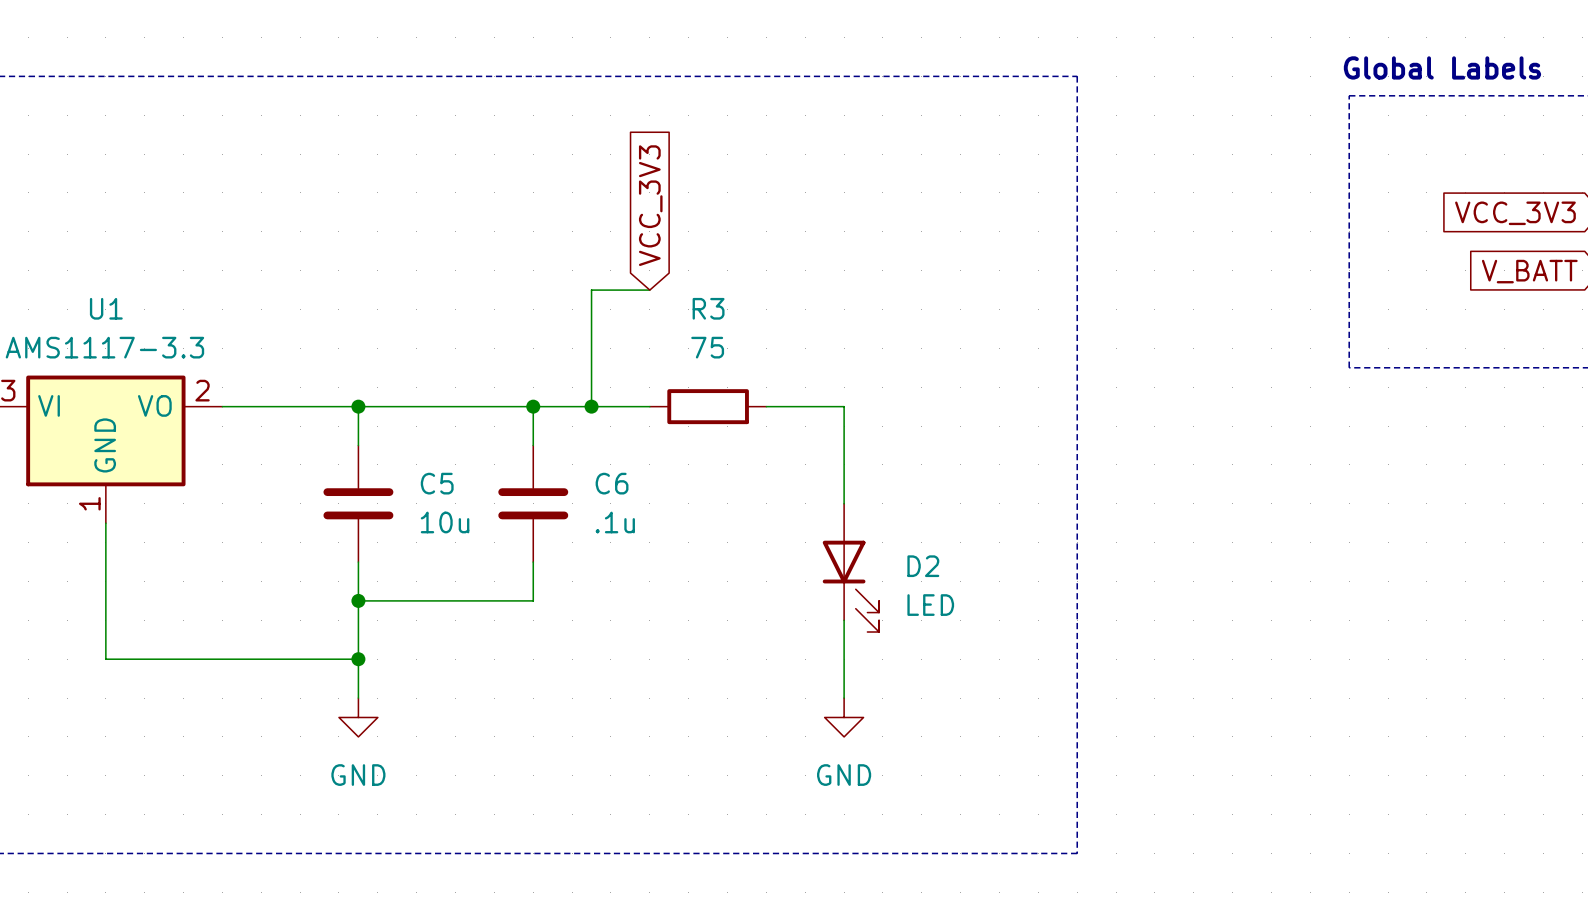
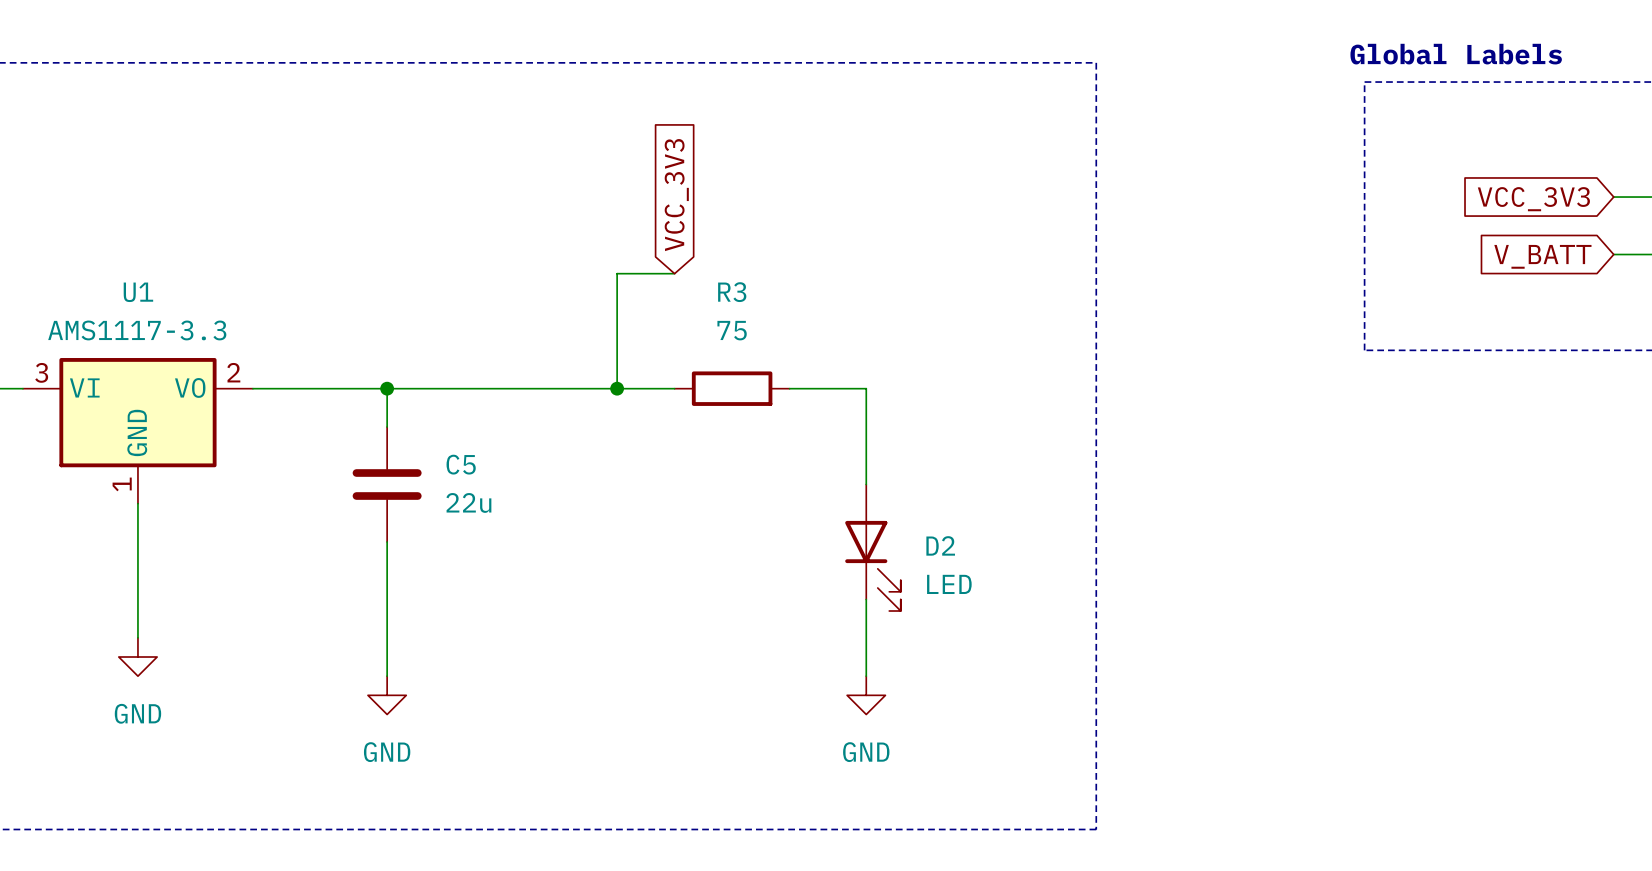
wire: (533, 406) (533, 445) -> none
junction: (533, 406) -> none
C6: .1u (533, 503) -> none
C5 value: 10u (445, 522) -> 22u (468, 502)
wire: (533, 562) (533, 600) (358, 600) -> none
junction: (358, 600) -> none
wire: (105, 659) (358, 659) -> none
junction: (358, 659) -> none
power symbol: none -> GND (137, 657)

